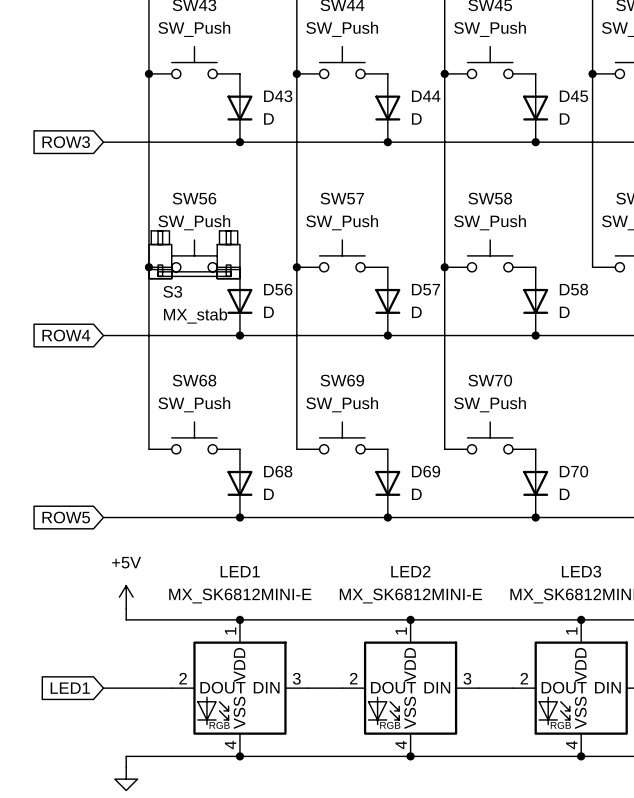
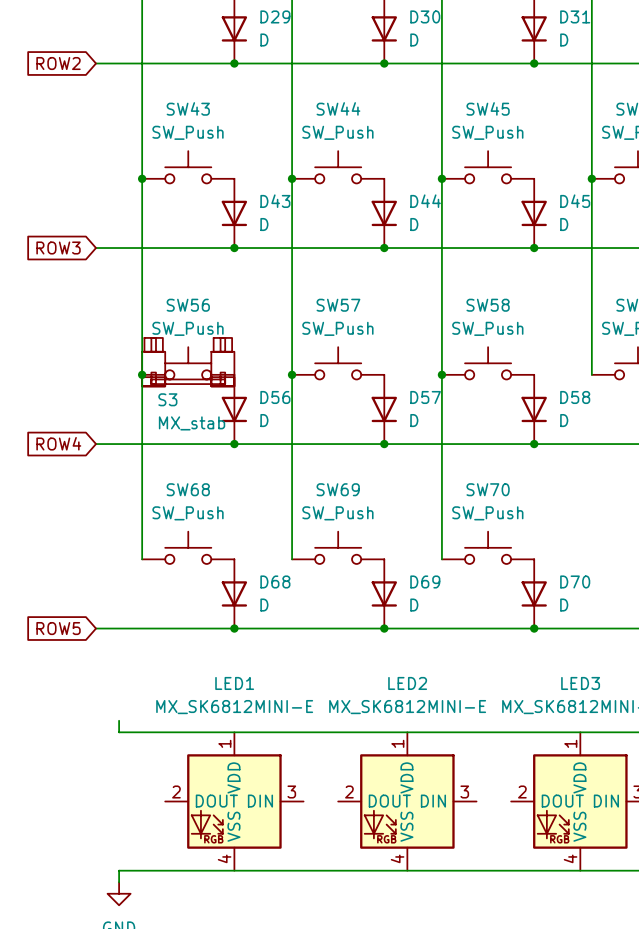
power symbol: +5V (126, 597) -> none
junction: (239, 619) -> none
junction: (410, 619) -> none
junction: (581, 619) -> none
global label: LED1 (70, 688) -> none
wire: (103, 688) (171, 688) -> none
wire: (308, 688) (342, 688) -> none
wire: (478, 688) (512, 688) -> none
junction: (239, 756) -> none
junction: (410, 756) -> none
junction: (581, 756) -> none

